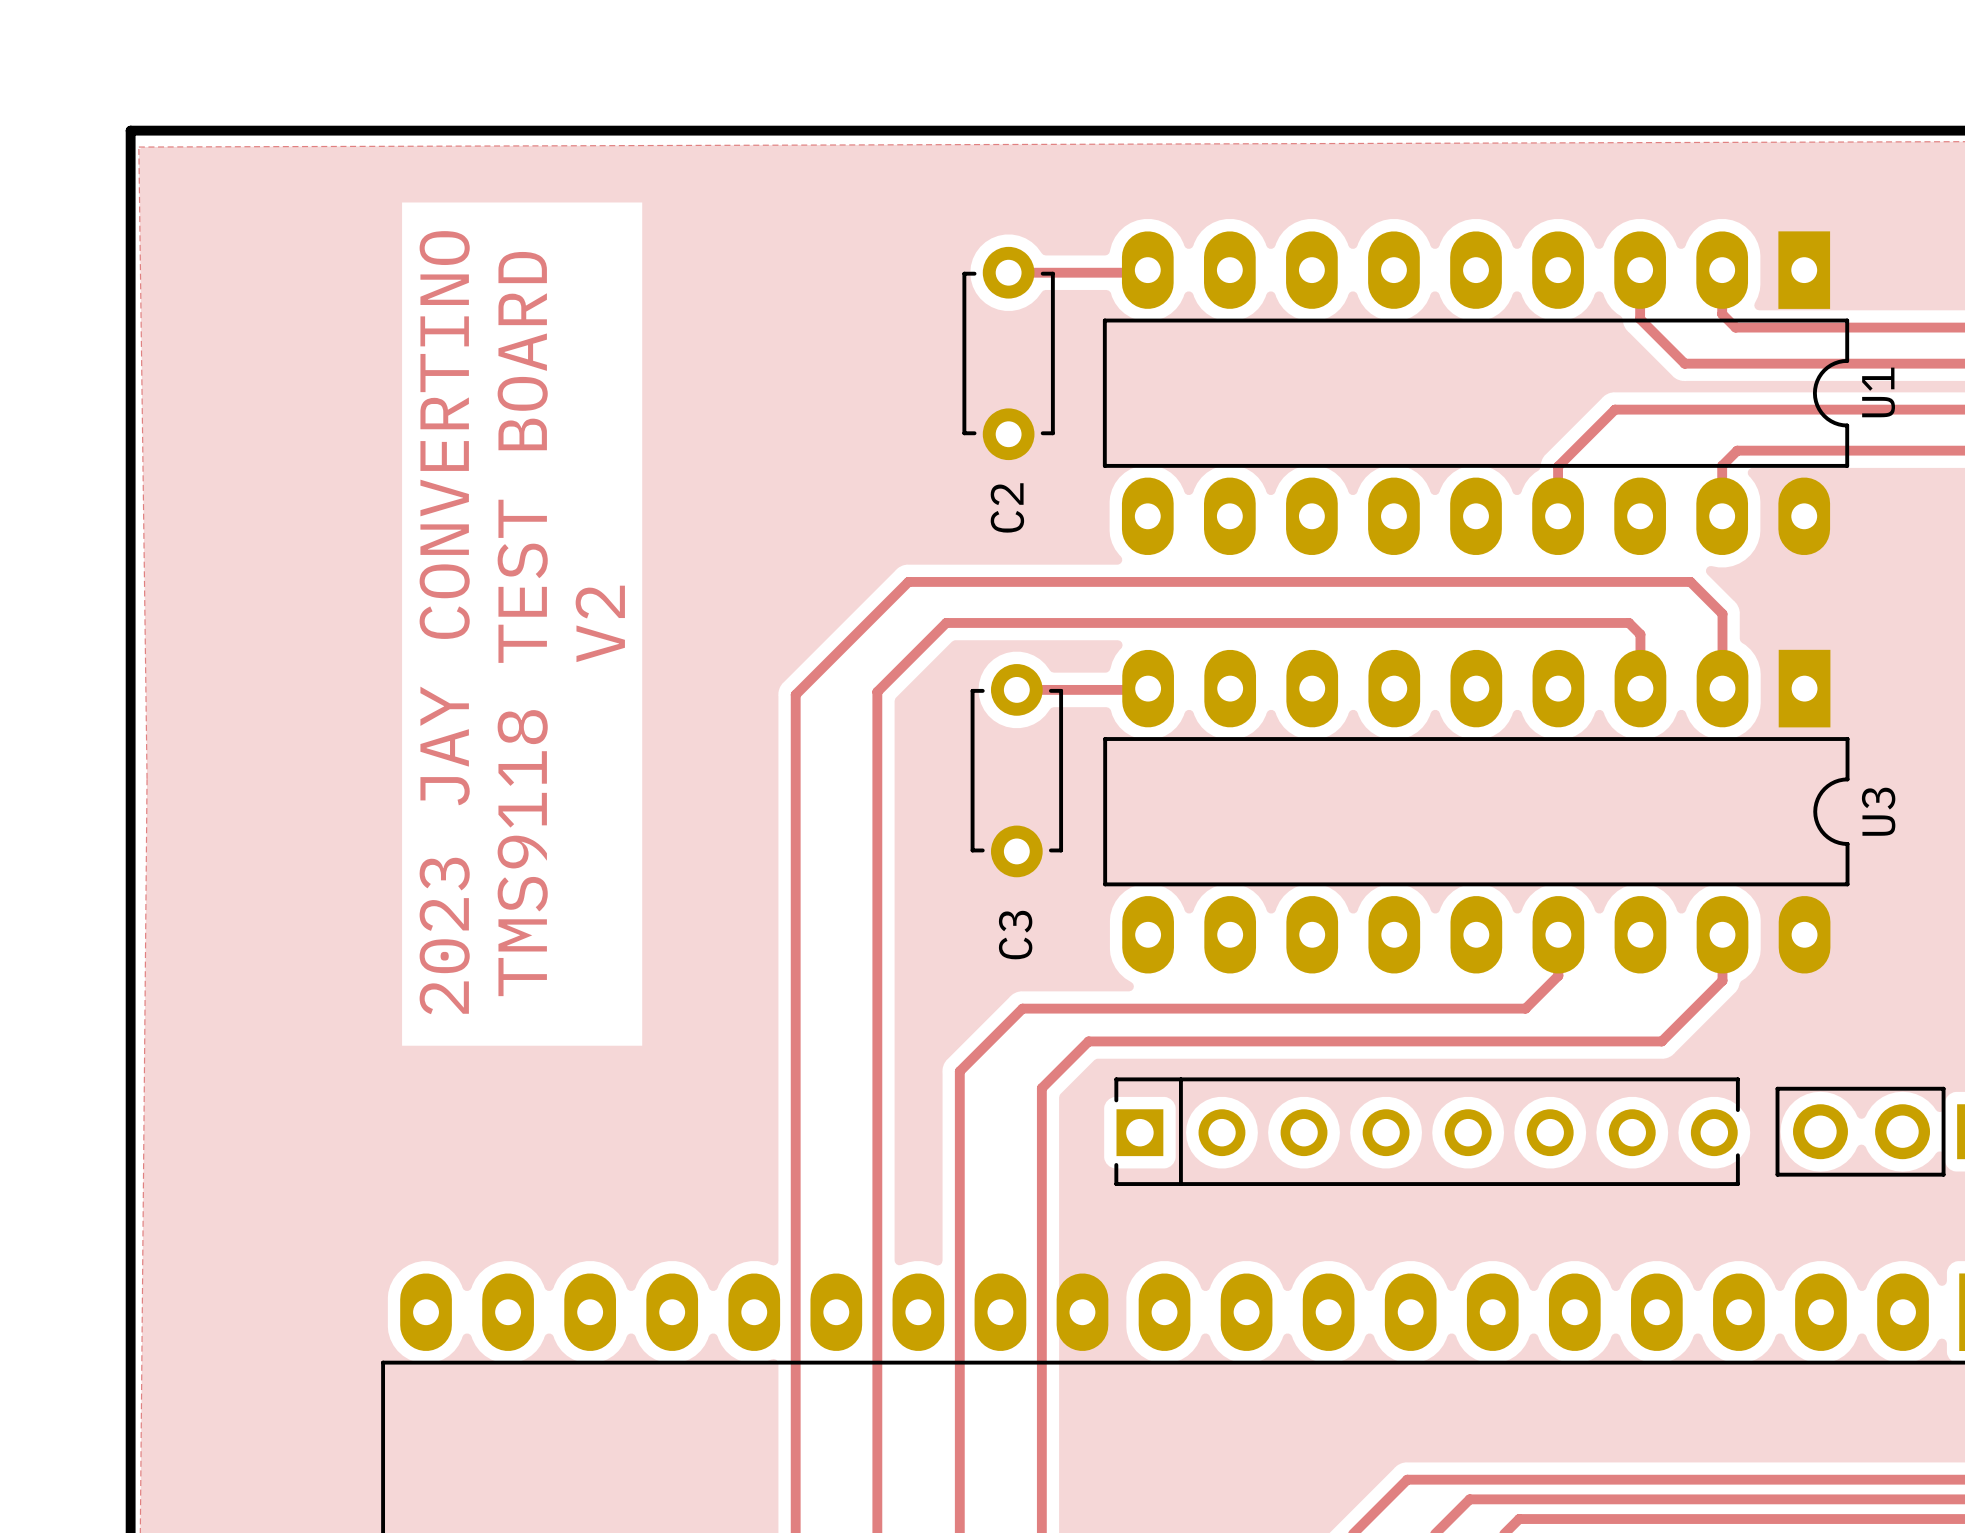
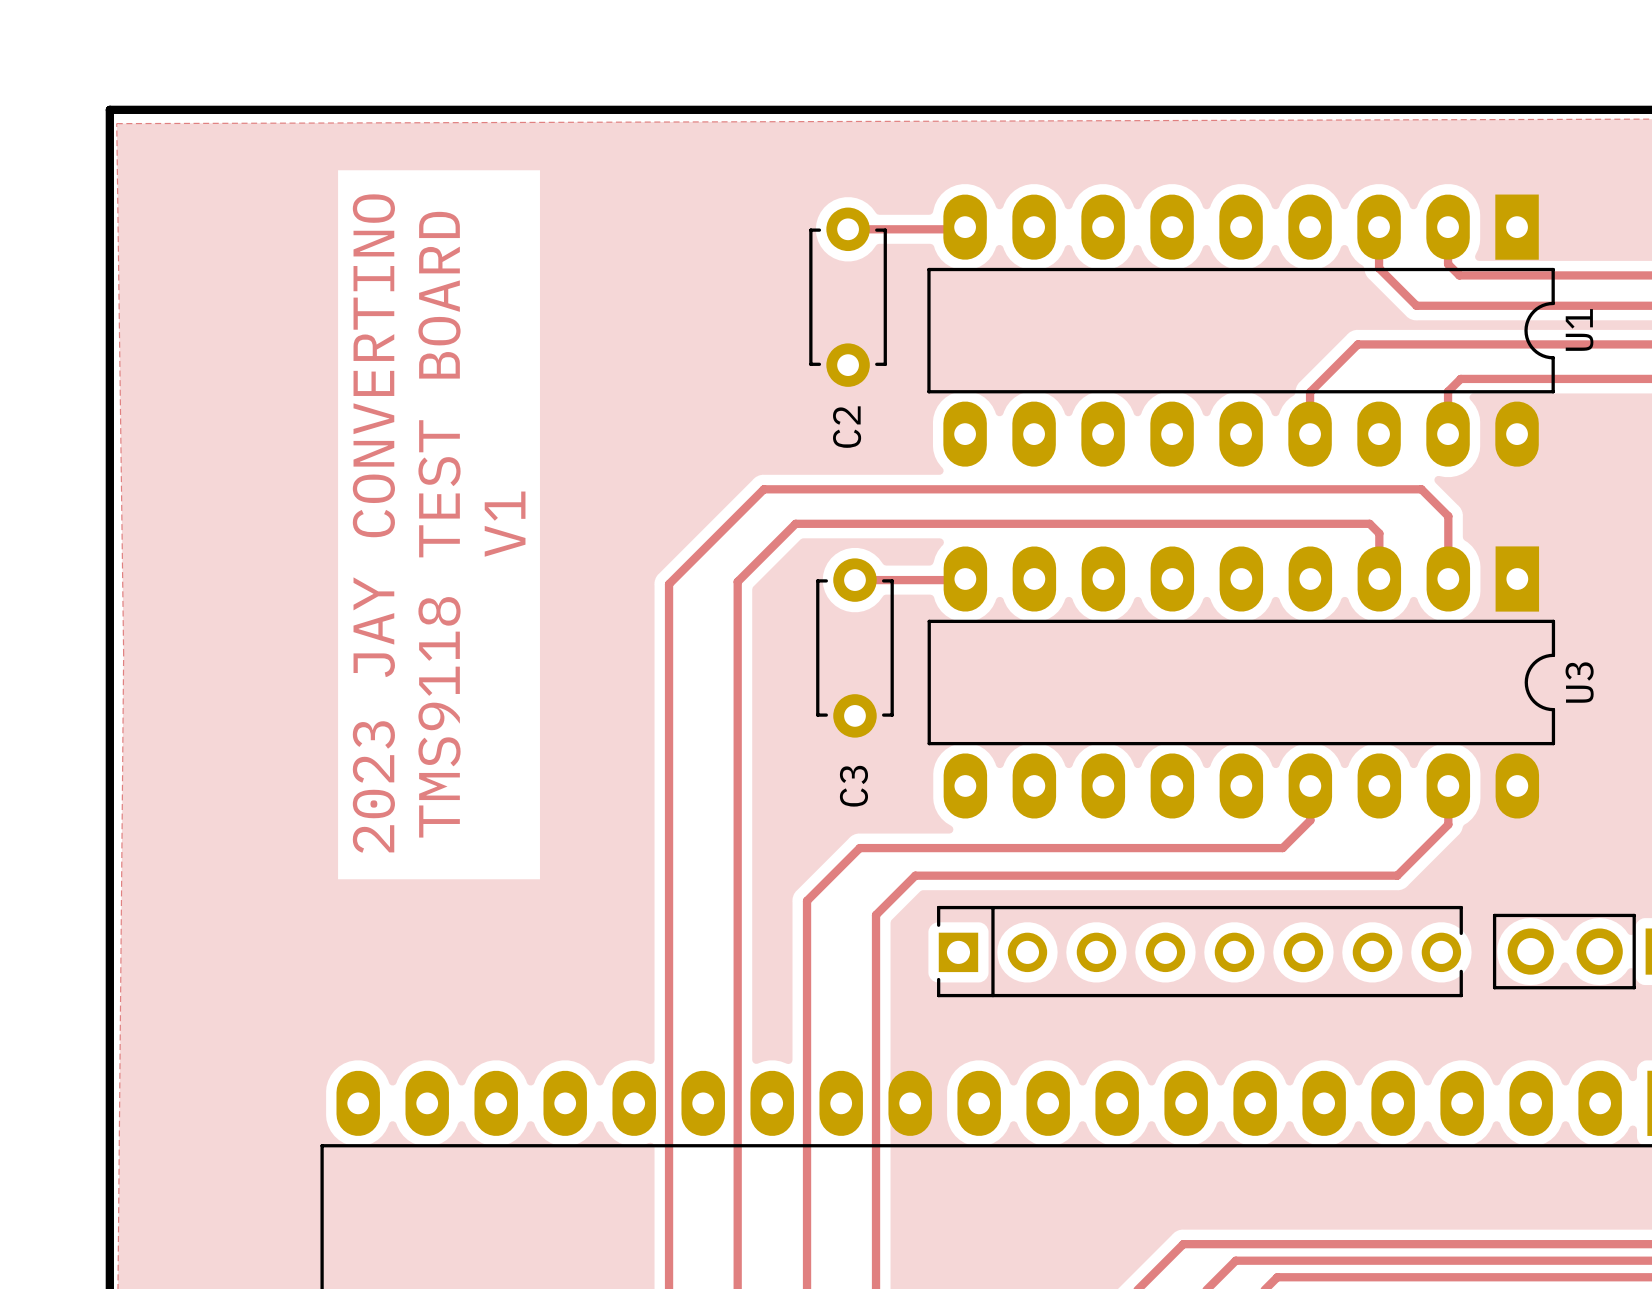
text: V2 (600, 623) -> V1 (505, 524)

